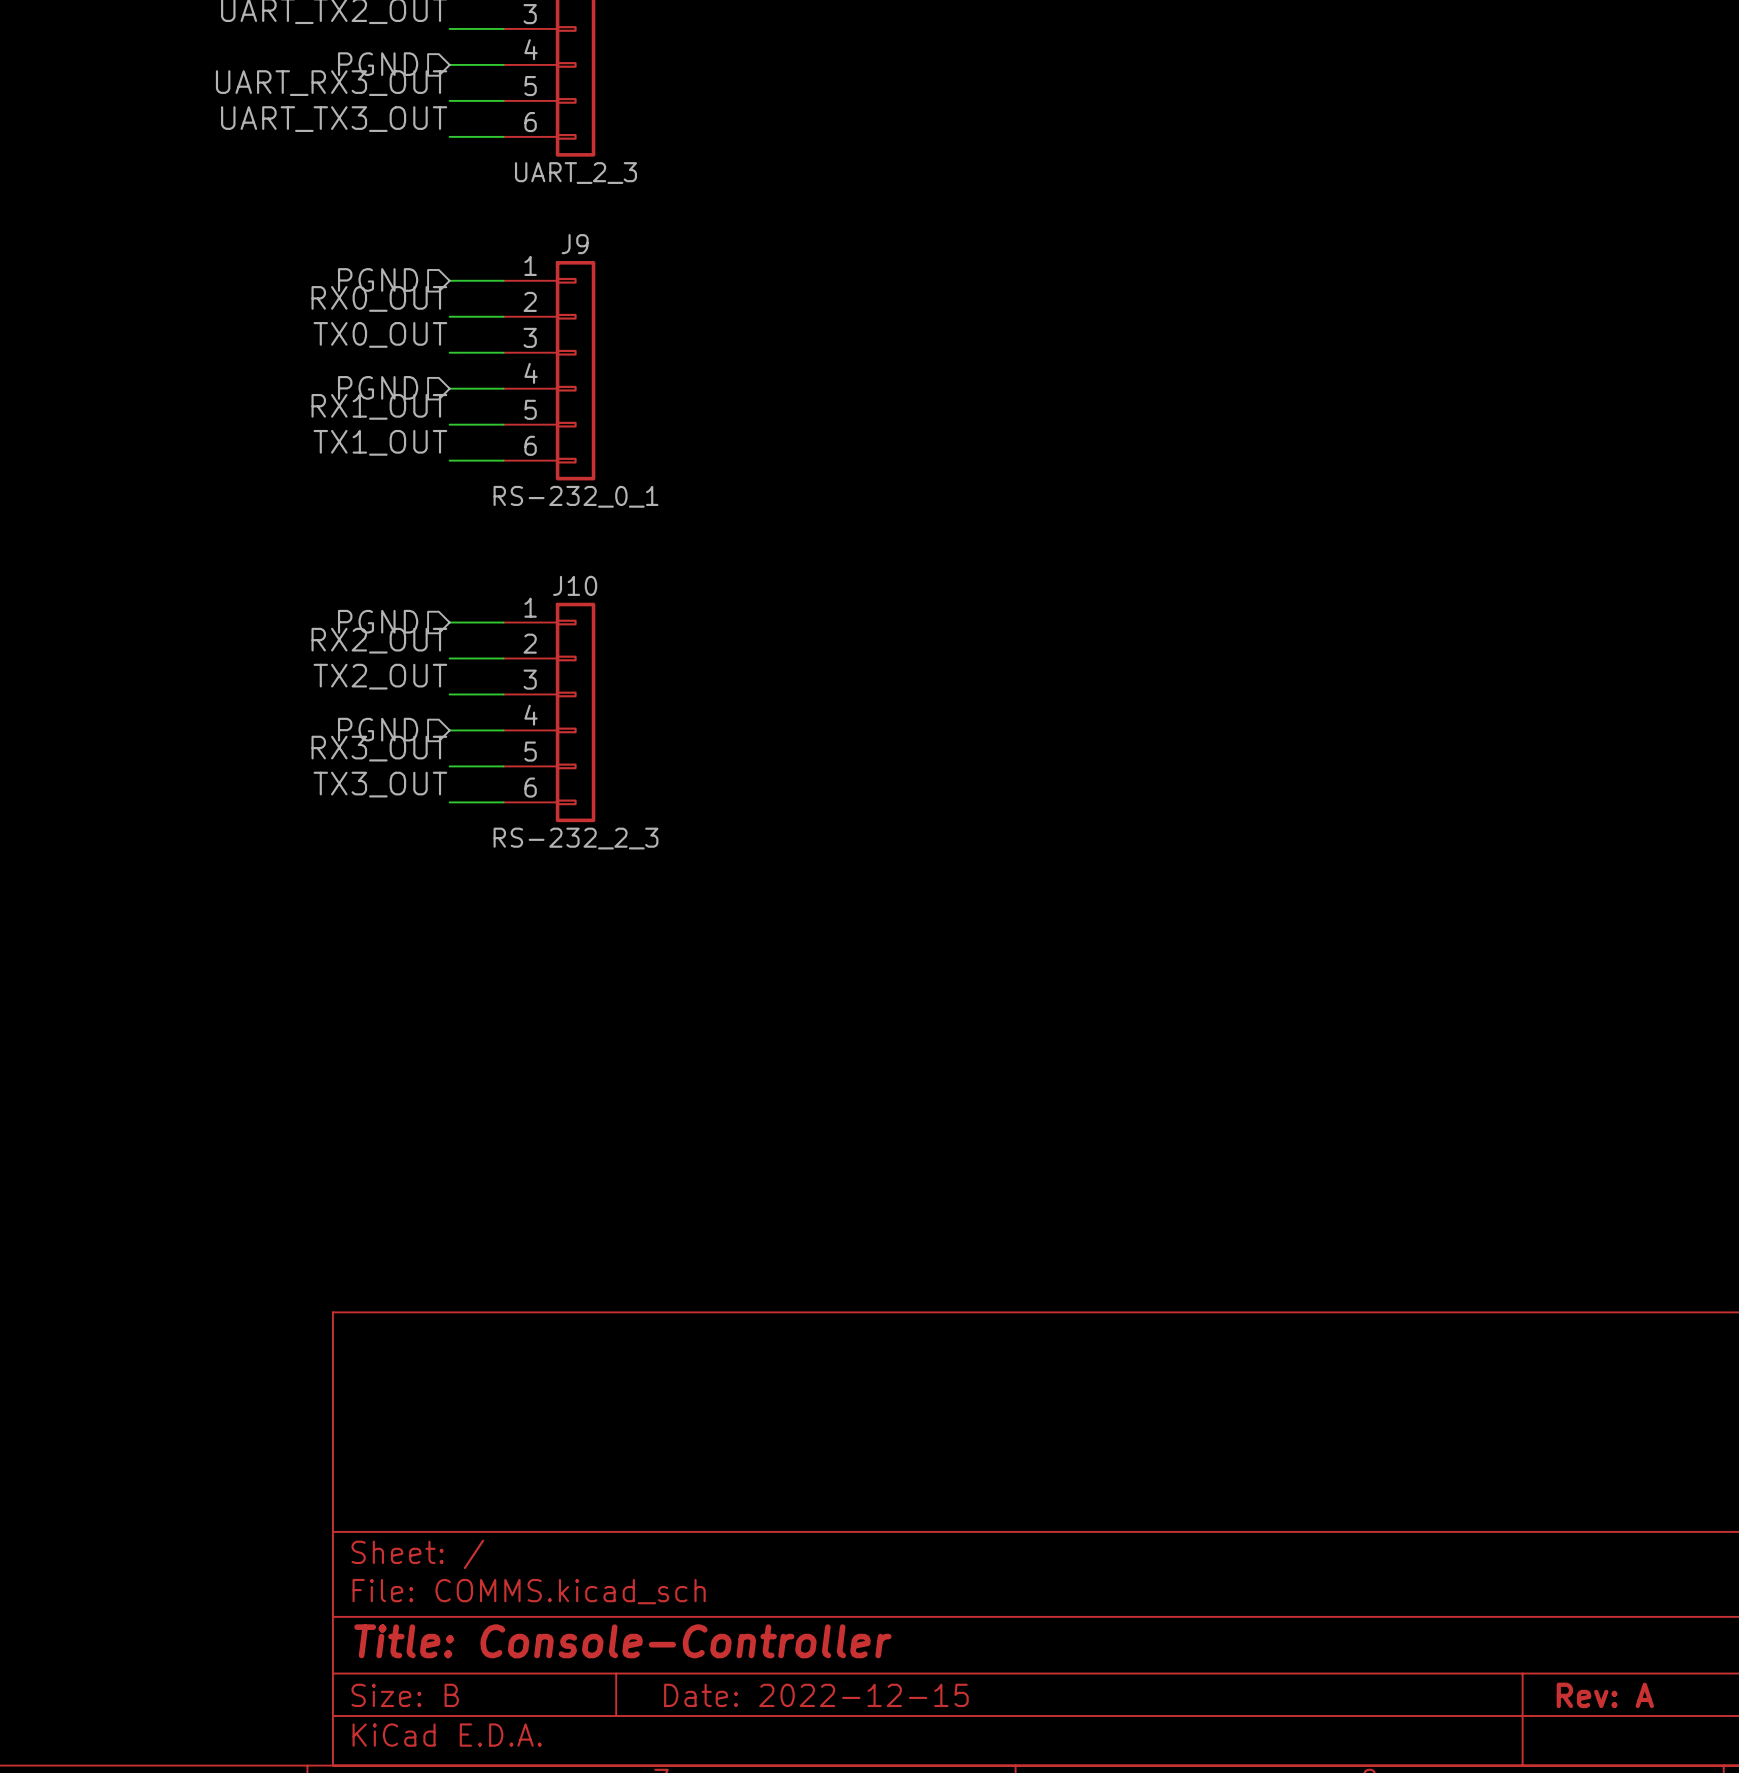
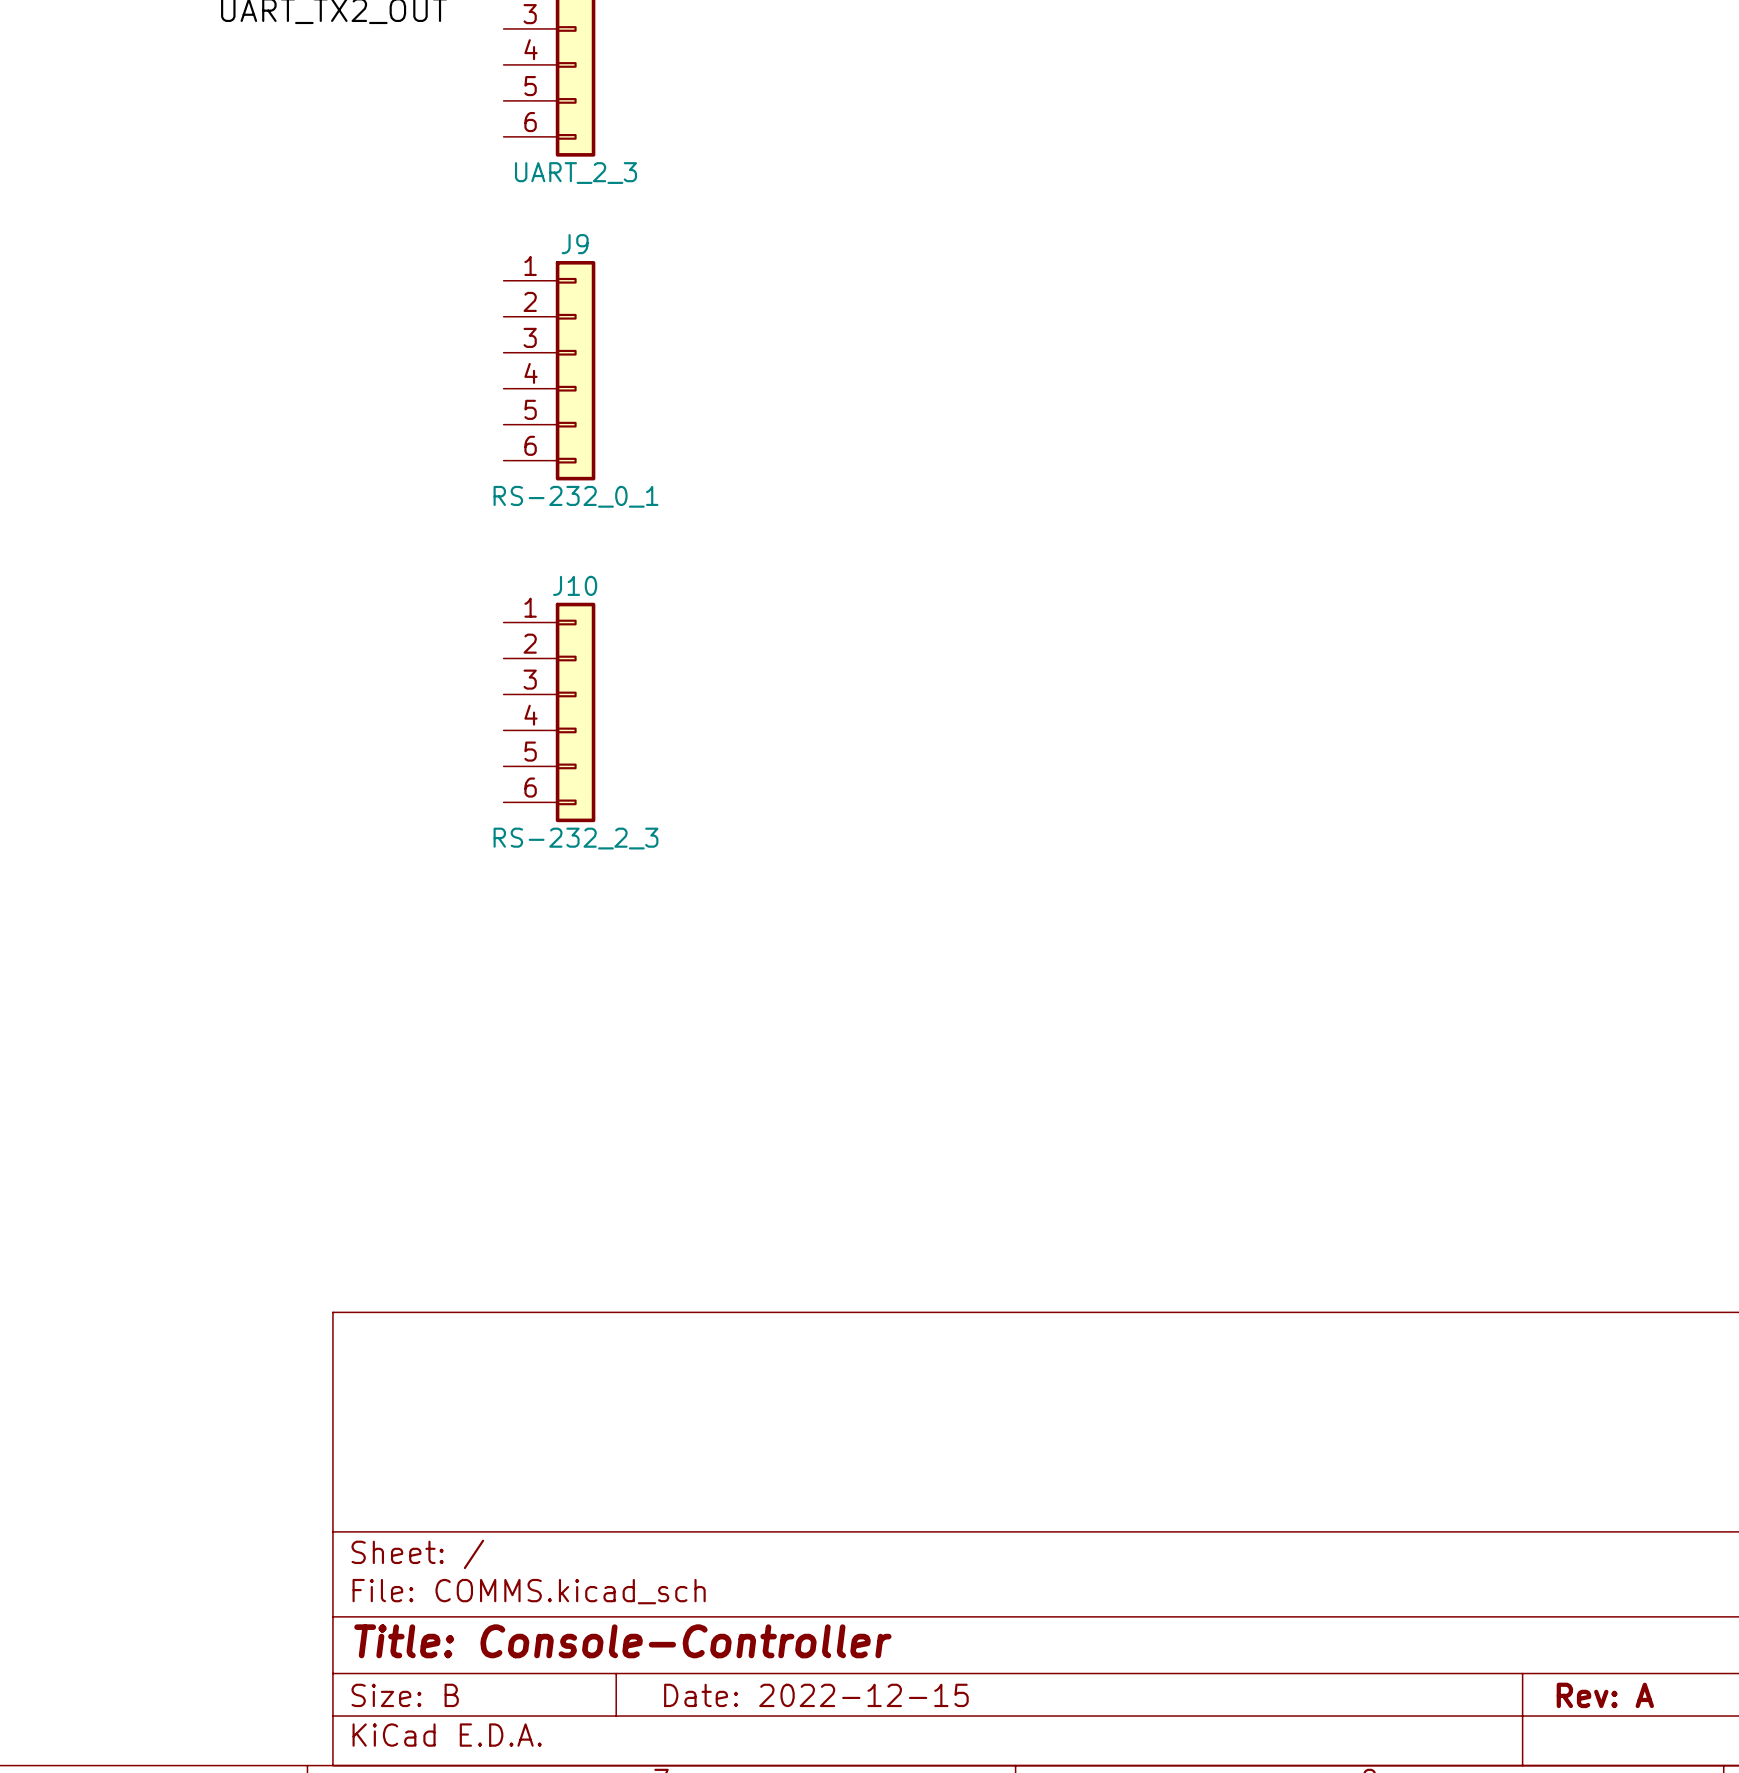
wire: (449, 28) (503, 28) -> none
hierarchical label: PGND (378, 64) -> none
wire: (449, 64) (503, 64) -> none
label: UART_RX3_OUT (331, 83) -> none
wire: (449, 100) (503, 100) -> none
label: UART_TX3_OUT (334, 119) -> none
wire: (449, 136) (503, 136) -> none
hierarchical label: PGND (378, 279) -> none
wire: (449, 280) (503, 280) -> none
label: RX0_OUT (379, 298) -> none
wire: (449, 316) (503, 316) -> none
label: TX0_OUT (380, 334) -> none
wire: (449, 352) (503, 352) -> none
hierarchical label: PGND (378, 387) -> none
wire: (449, 388) (503, 388) -> none
label: RX1_OUT (379, 406) -> none
wire: (449, 424) (503, 424) -> none
label: TX1_OUT (380, 442) -> none
wire: (449, 460) (503, 460) -> none
hierarchical label: PGND (378, 621) -> none
wire: (449, 622) (503, 622) -> none
label: RX2_OUT (379, 640) -> none
wire: (449, 658) (503, 658) -> none
label: TX2_OUT (380, 676) -> none
wire: (449, 694) (503, 694) -> none
hierarchical label: PGND (378, 729) -> none
wire: (449, 730) (503, 730) -> none
label: RX3_OUT (379, 748) -> none
wire: (449, 766) (503, 766) -> none
label: TX3_OUT (380, 784) -> none
wire: (449, 802) (503, 802) -> none

